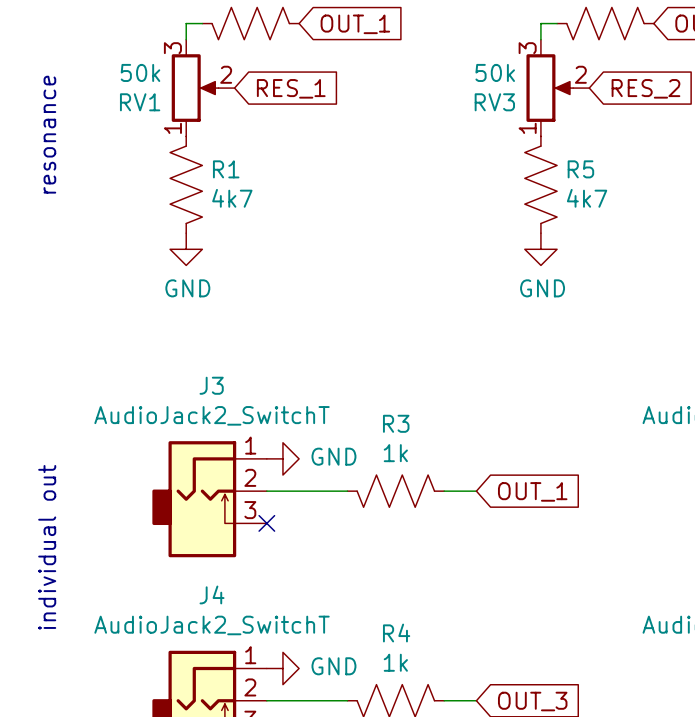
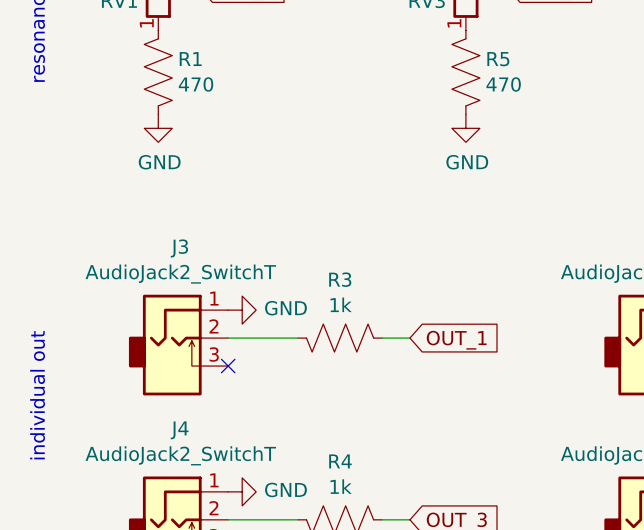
R1 value: 4k7 (232, 198) -> 470 (196, 84)
R5 value: 4k7 (587, 198) -> 470 (503, 84)

